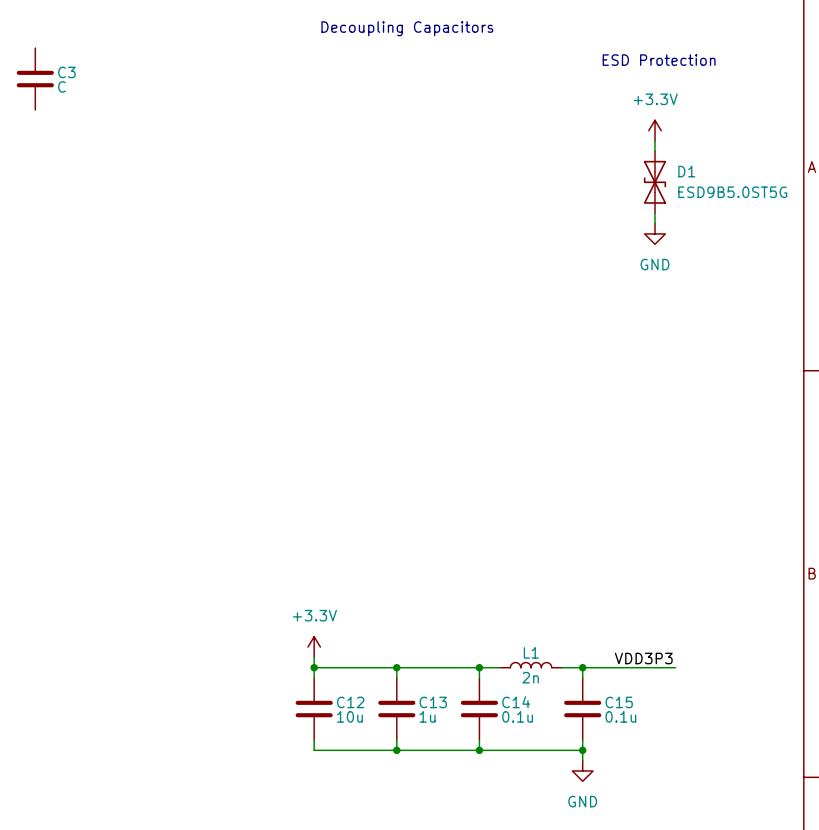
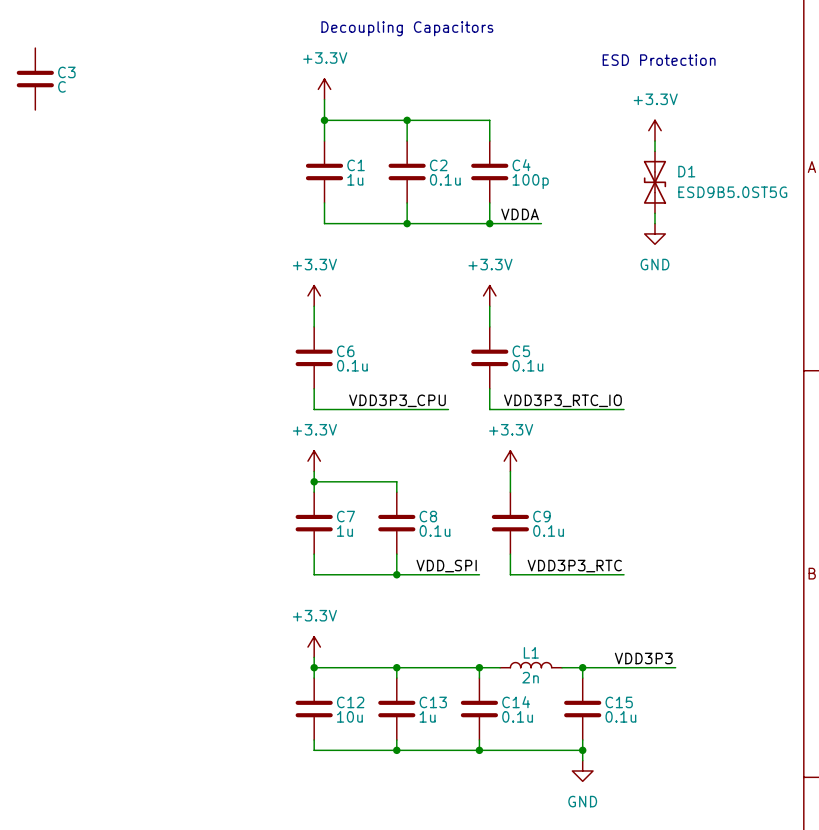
power symbol: none -> +3.3V (324, 89)
wire: none -> (324, 99) (324, 141)
wire: none -> (324, 120) (489, 120) (489, 141)
junction: none -> (324, 120)
wire: none -> (407, 120) (407, 141)
junction: none -> (407, 120)
C1: none -> 1u (324, 171)
C2: none -> 0.1u (407, 171)
C4: none -> 100p (489, 171)
wire: none -> (324, 202) (324, 223) (541, 223)
wire: none -> (407, 202) (407, 223)
wire: none -> (489, 202) (489, 223)
label: none -> VDDA (520, 214)
junction: none -> (407, 223)
junction: none -> (489, 223)
power symbol: none -> +3.3V (314, 295)
power symbol: none -> +3.3V (489, 295)
wire: none -> (314, 306) (314, 326)
wire: none -> (489, 306) (489, 326)
C6: none -> 0.1u (314, 357)
C5: none -> 0.1u (489, 357)
wire: none -> (314, 388) (314, 409) (448, 409)
wire: none -> (489, 388) (489, 409) (624, 409)
label: none -> VDD3P3_CPU (397, 400)
label: none -> VDD3P3_RTC_IO (562, 400)
power symbol: none -> +3.3V (314, 461)
power symbol: none -> +3.3V (510, 461)
wire: none -> (314, 471) (314, 492)
wire: none -> (510, 471) (510, 492)
wire: none -> (314, 481) (396, 481) (396, 492)
junction: none -> (314, 481)
C7: none -> 1u (314, 523)
C8: none -> 0.1u (396, 523)
C9: none -> 0.1u (510, 523)
wire: none -> (314, 554) (314, 574) (479, 574)
wire: none -> (396, 554) (396, 574)
wire: none -> (510, 554) (510, 574) (624, 574)
label: none -> VDD_SPI (446, 566)
label: none -> VDD3P3_RTC (574, 566)
junction: none -> (396, 574)

